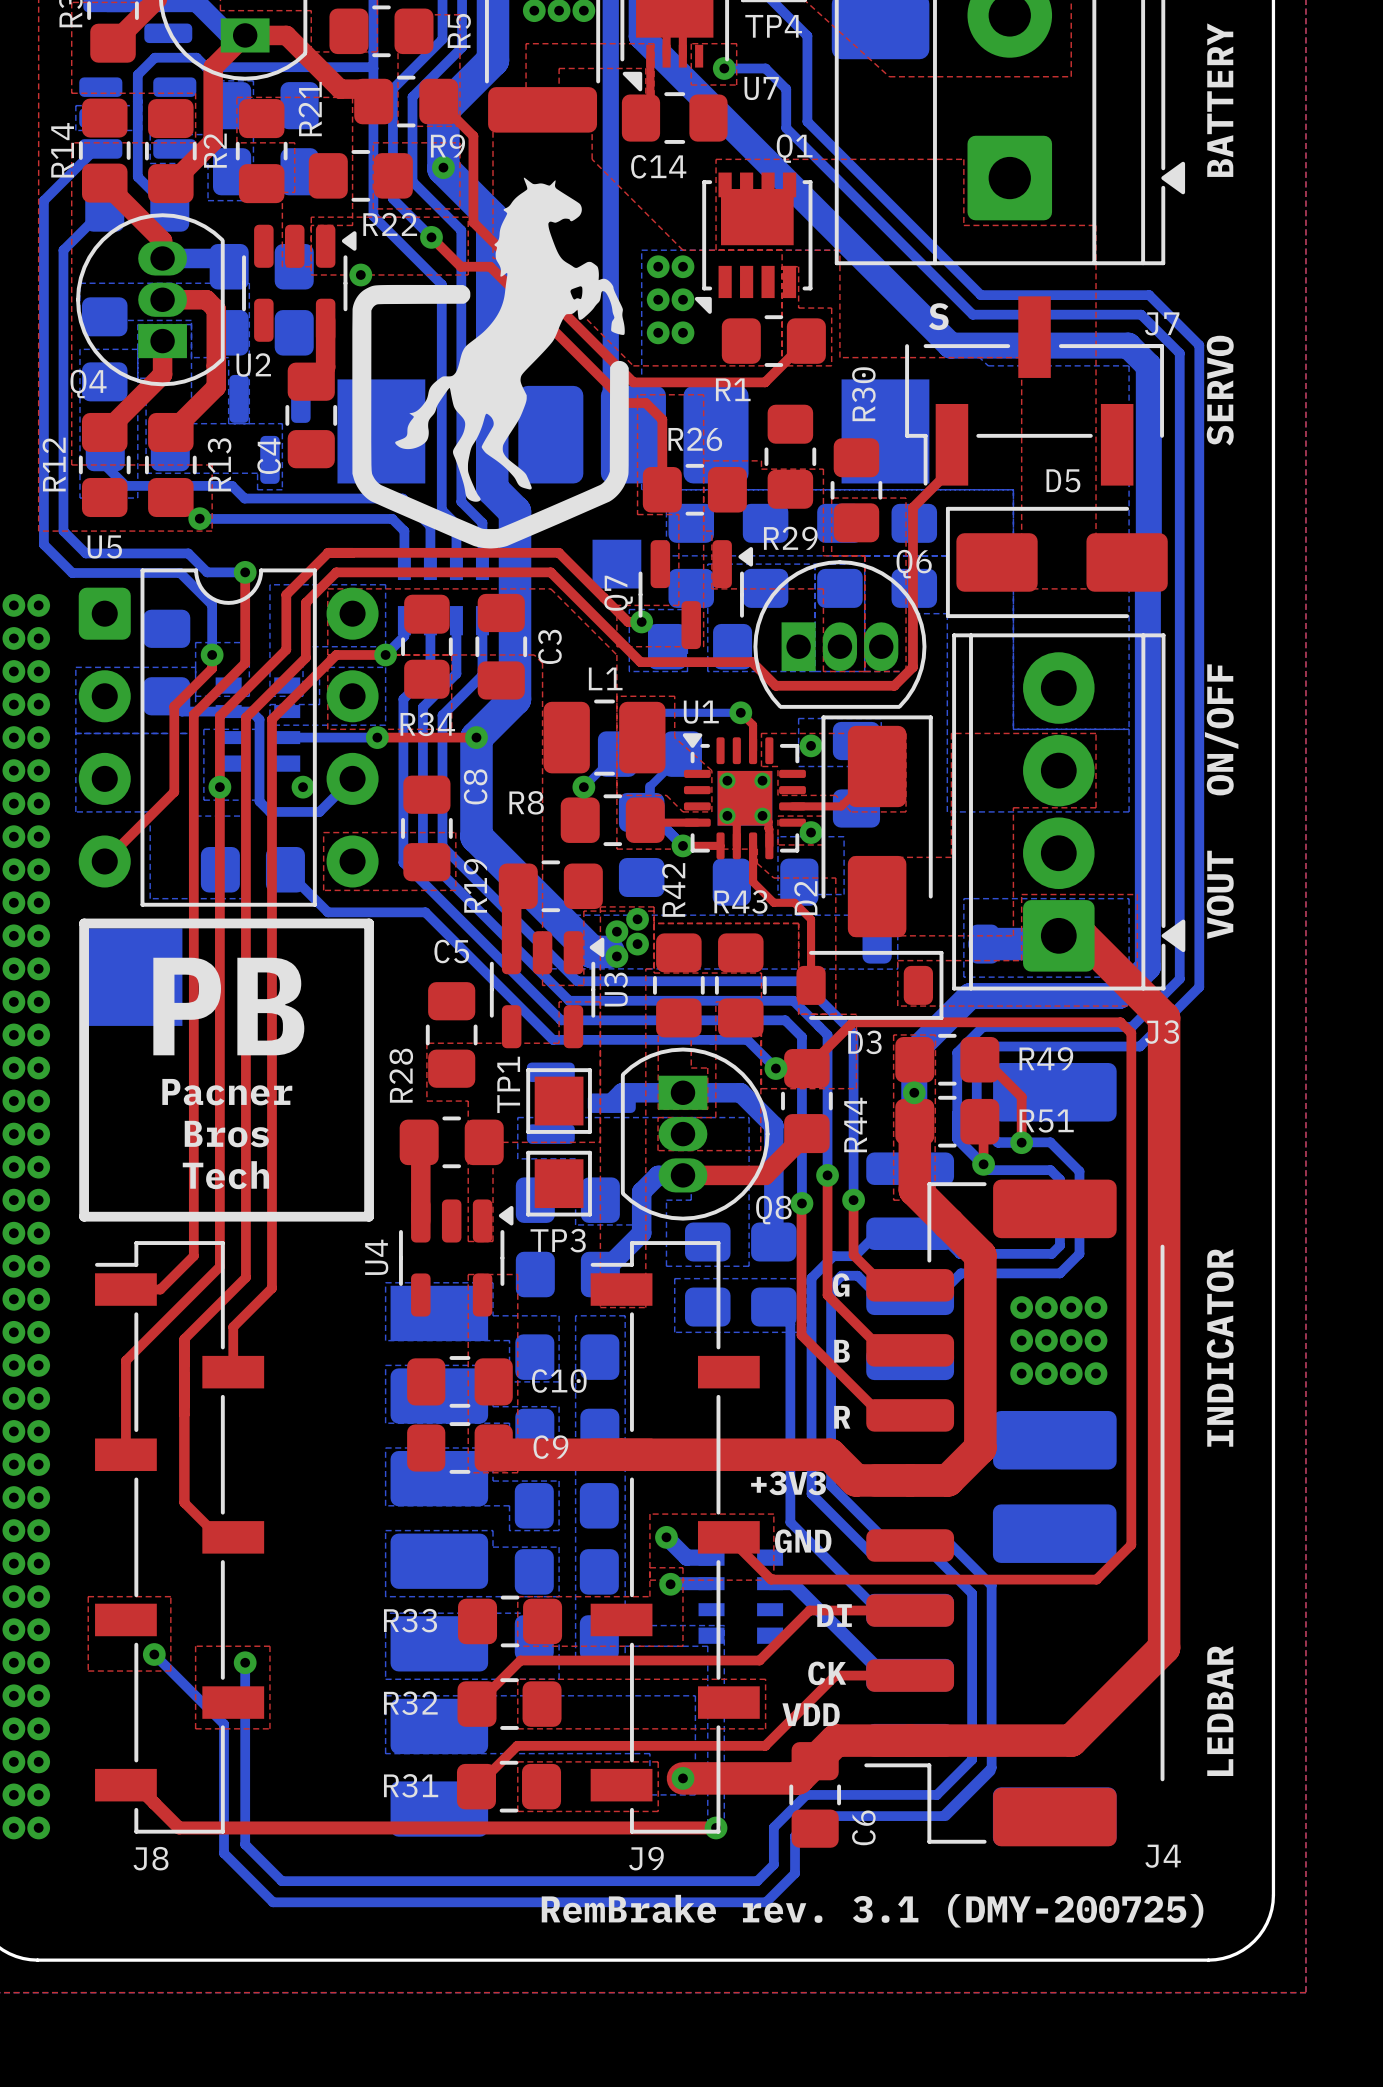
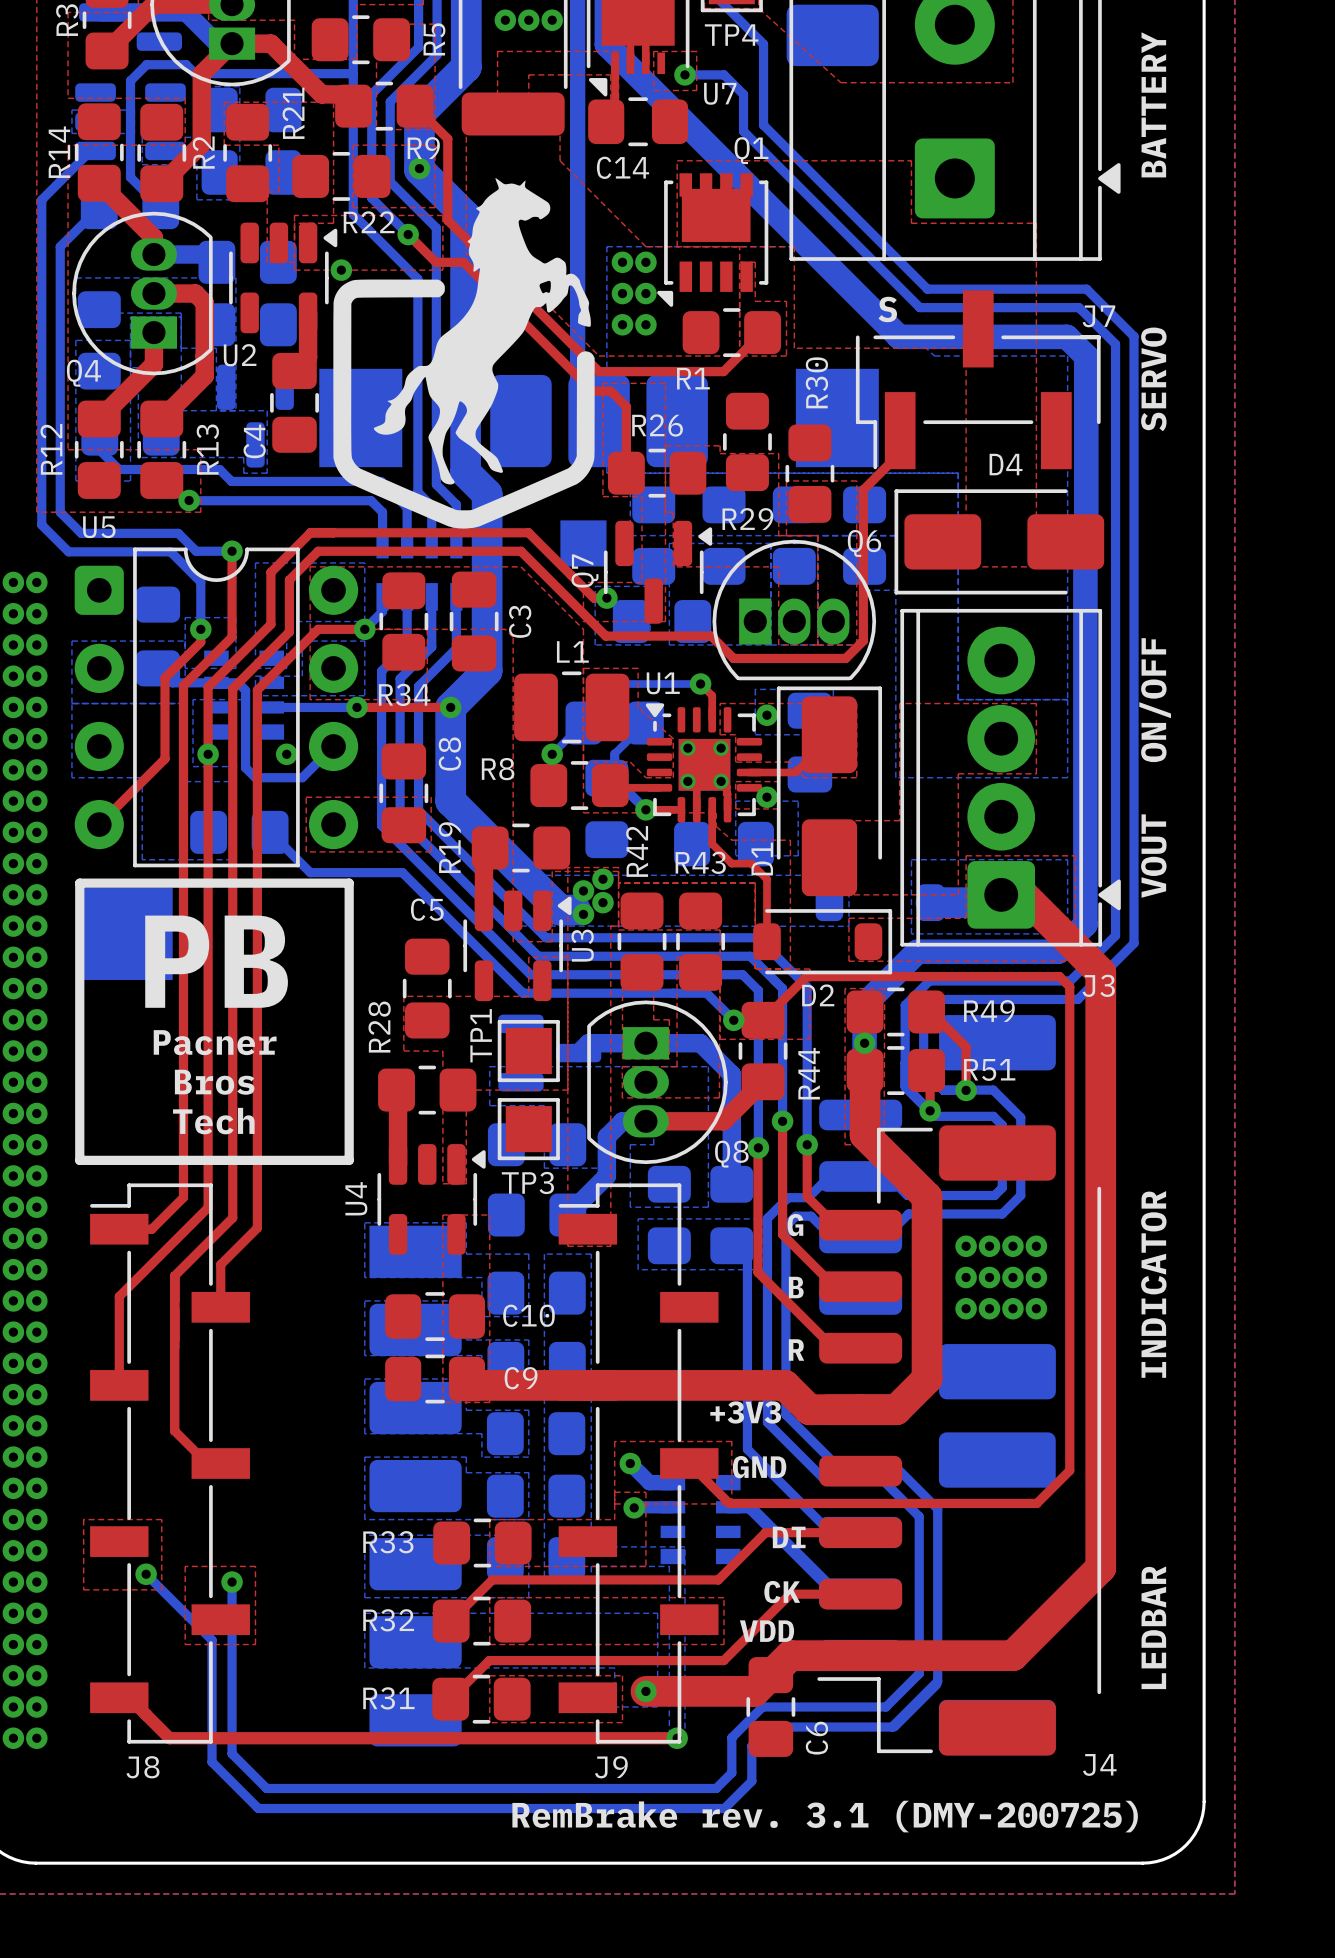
D5 name: D5 (1063, 480) -> D4 (1006, 464)
D2 name: D2 (805, 898) -> D1 (762, 858)
D3 name: D3 (864, 1042) -> D2 (818, 995)

